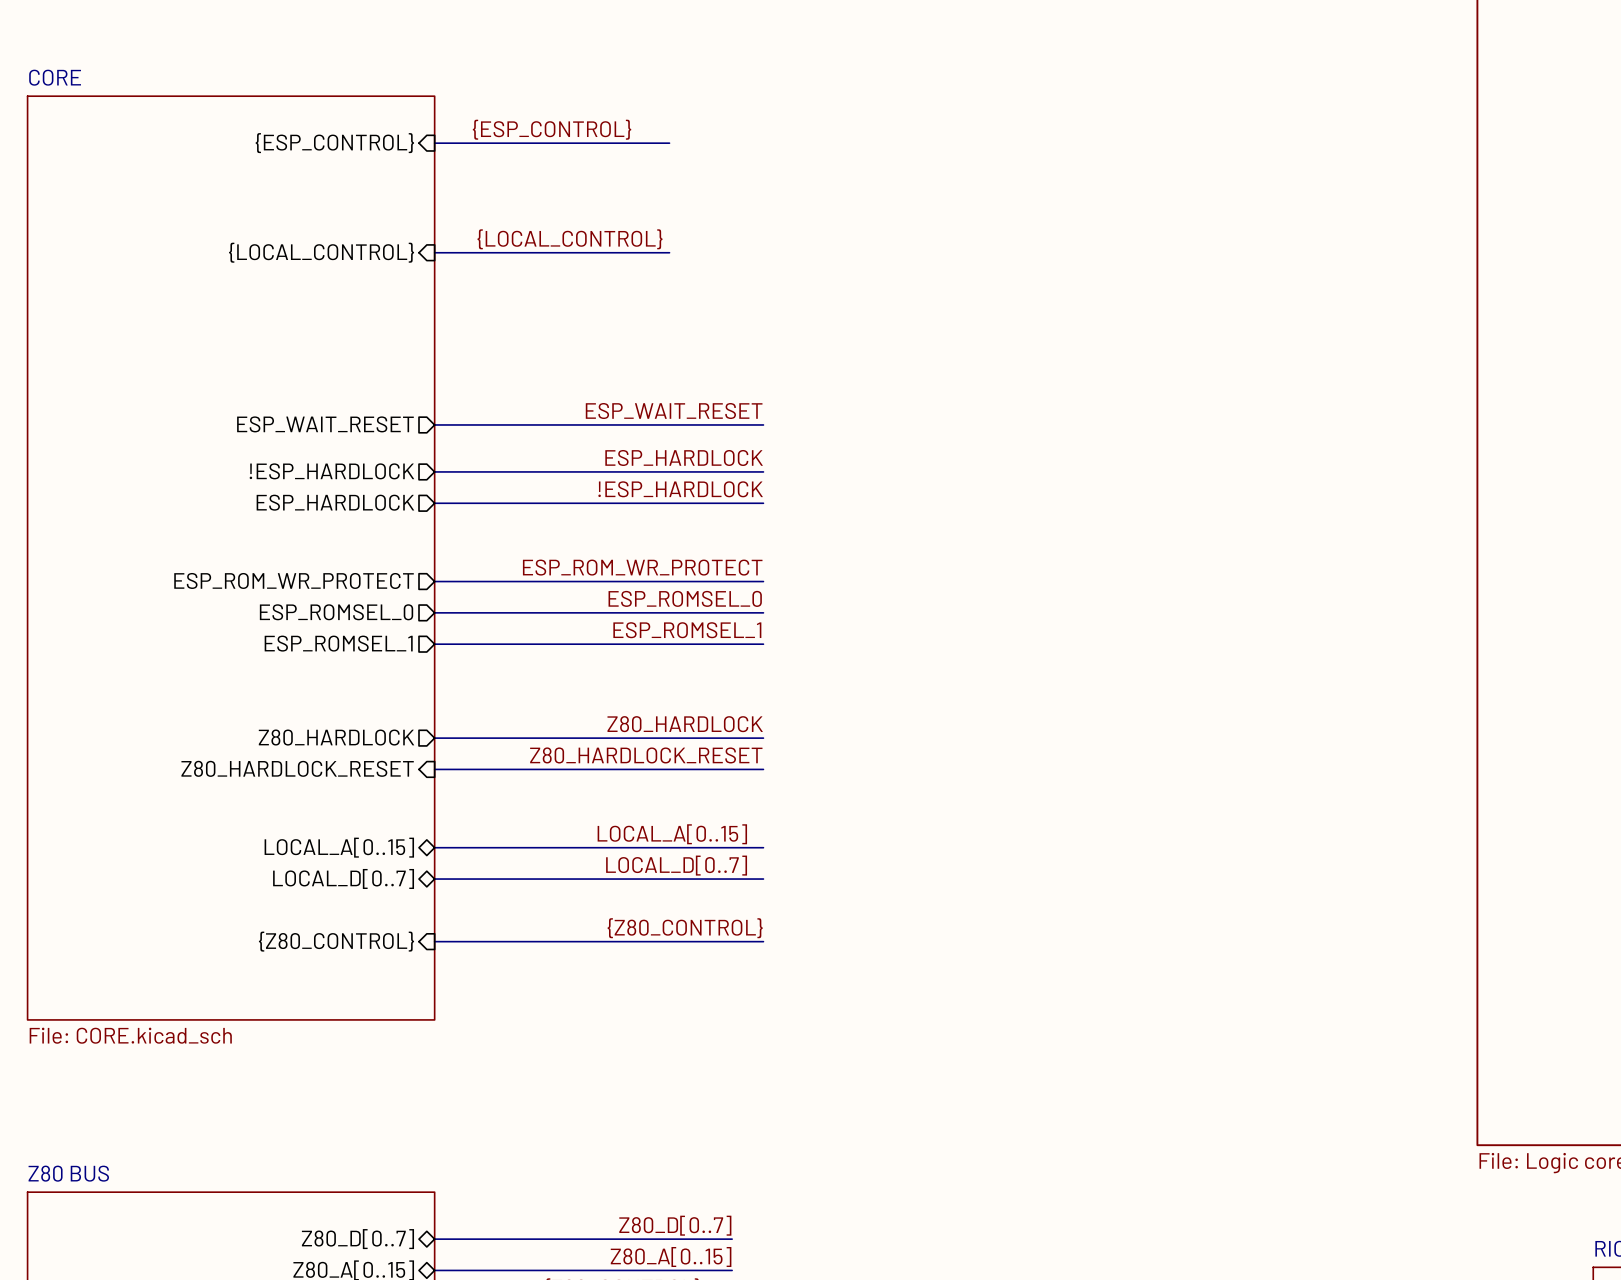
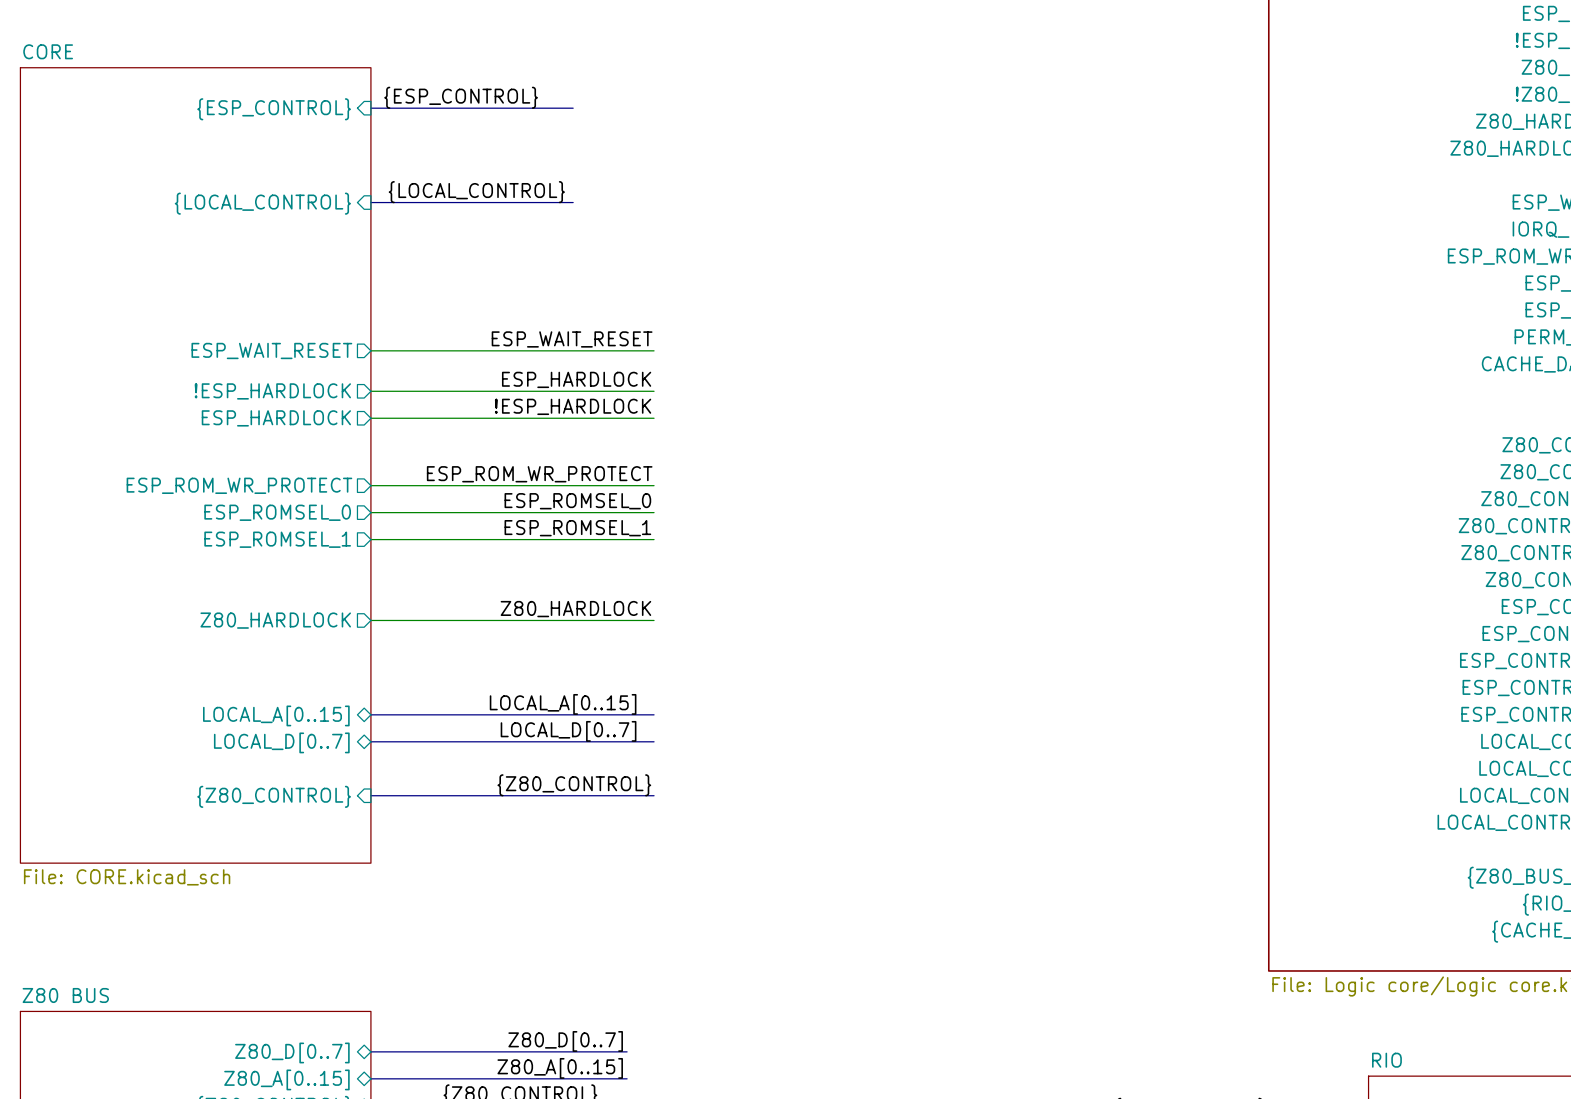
label: Z80_HARDLOCK_RESET (646, 755) -> none
sheet pin: Z80_HARDLOCK_RESET (297, 768) -> none
wire: (434, 769) (763, 769) -> none

